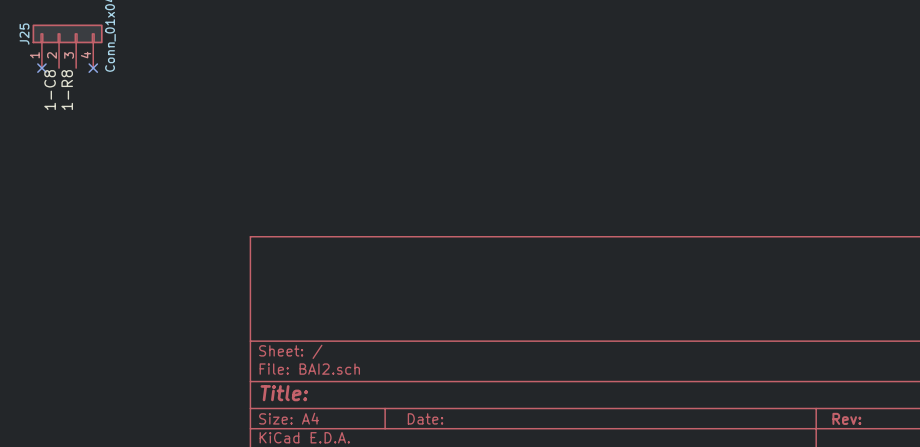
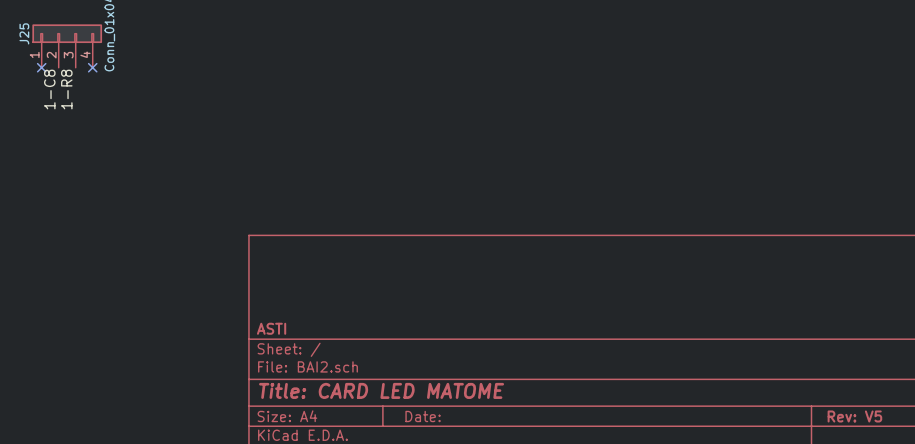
title block: none -> ASTI (271, 328)
title block: Title: (284, 393) -> Title: CARD LED MATOME (381, 390)
title block: Rev: (846, 418) -> Rev: V5 (854, 416)

